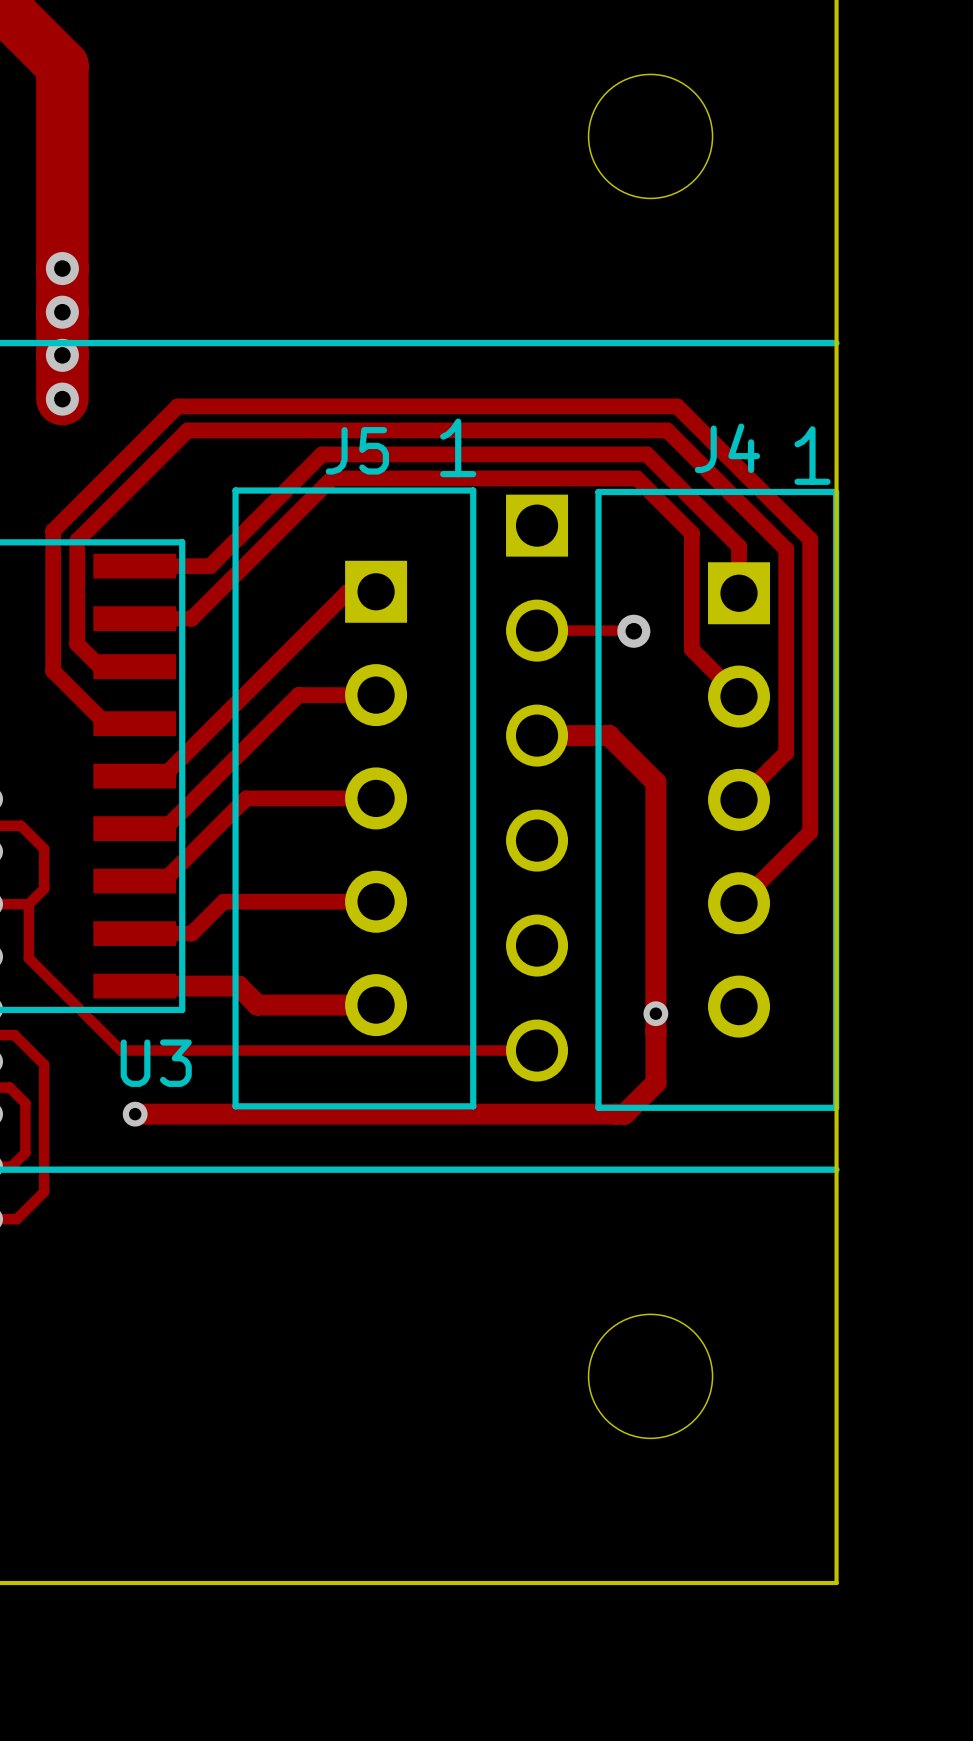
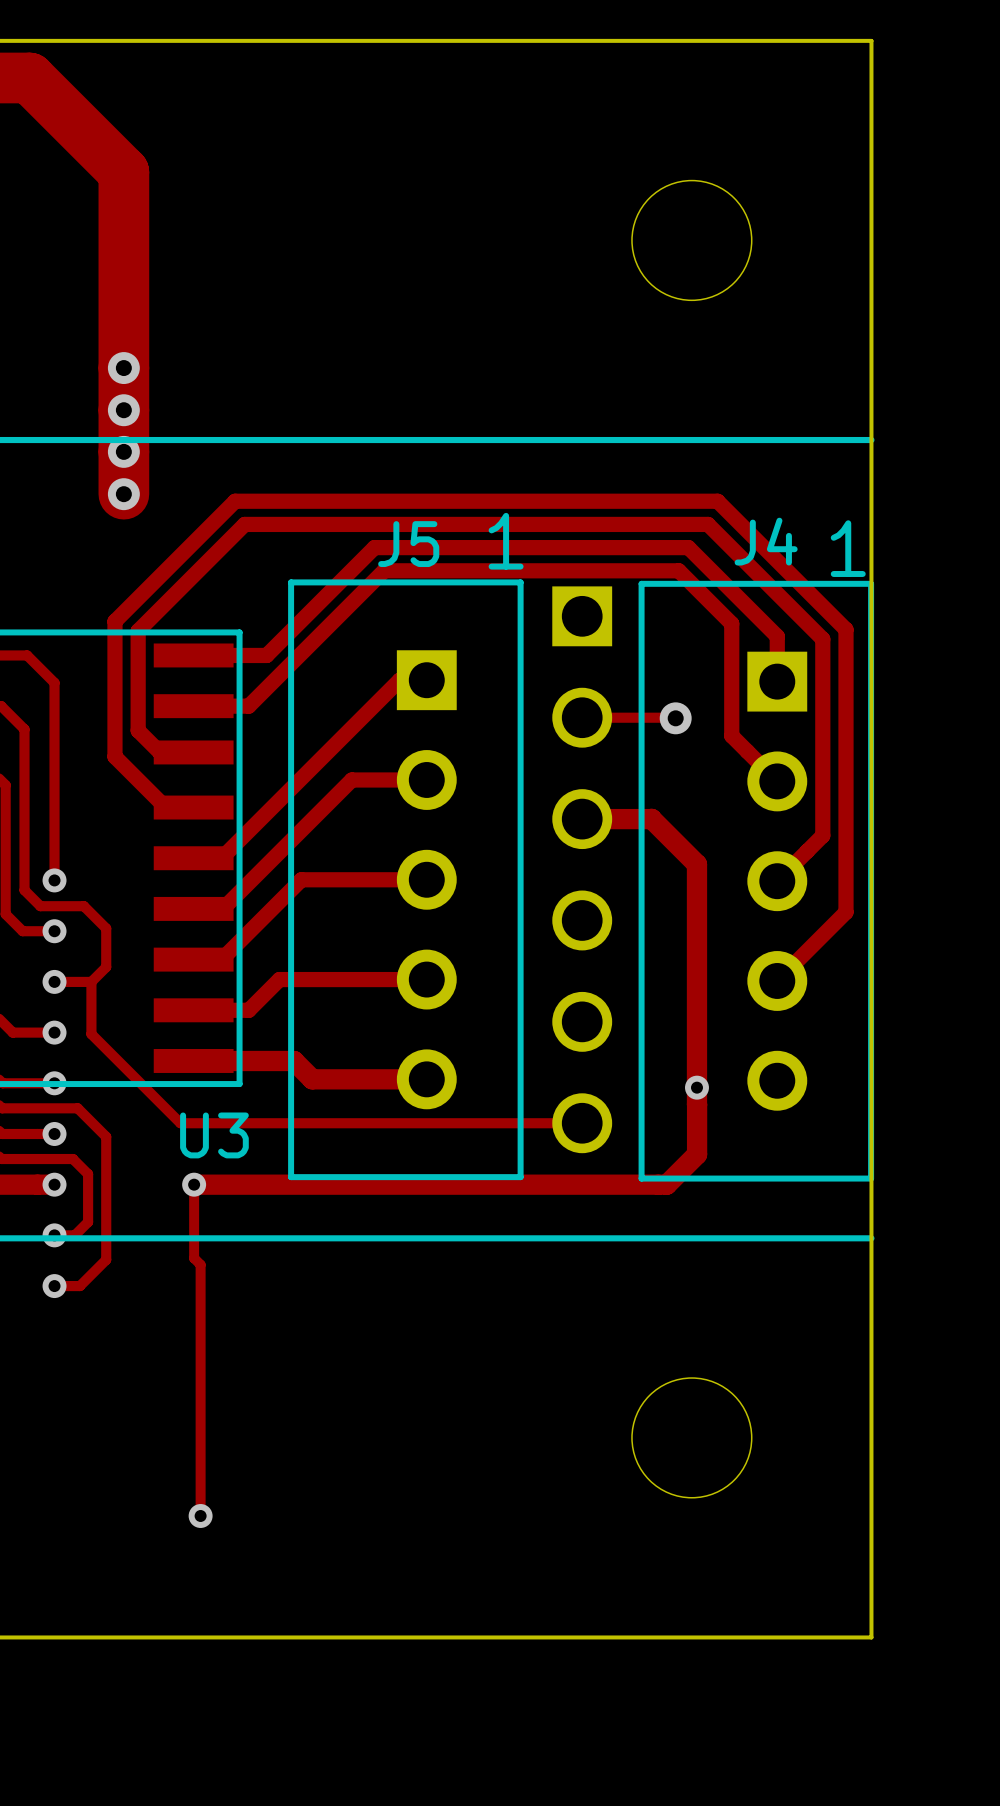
track: none -> (194, 1184) (194, 1258) (200, 1264) (200, 1515)
via: none -> (200, 1515)

